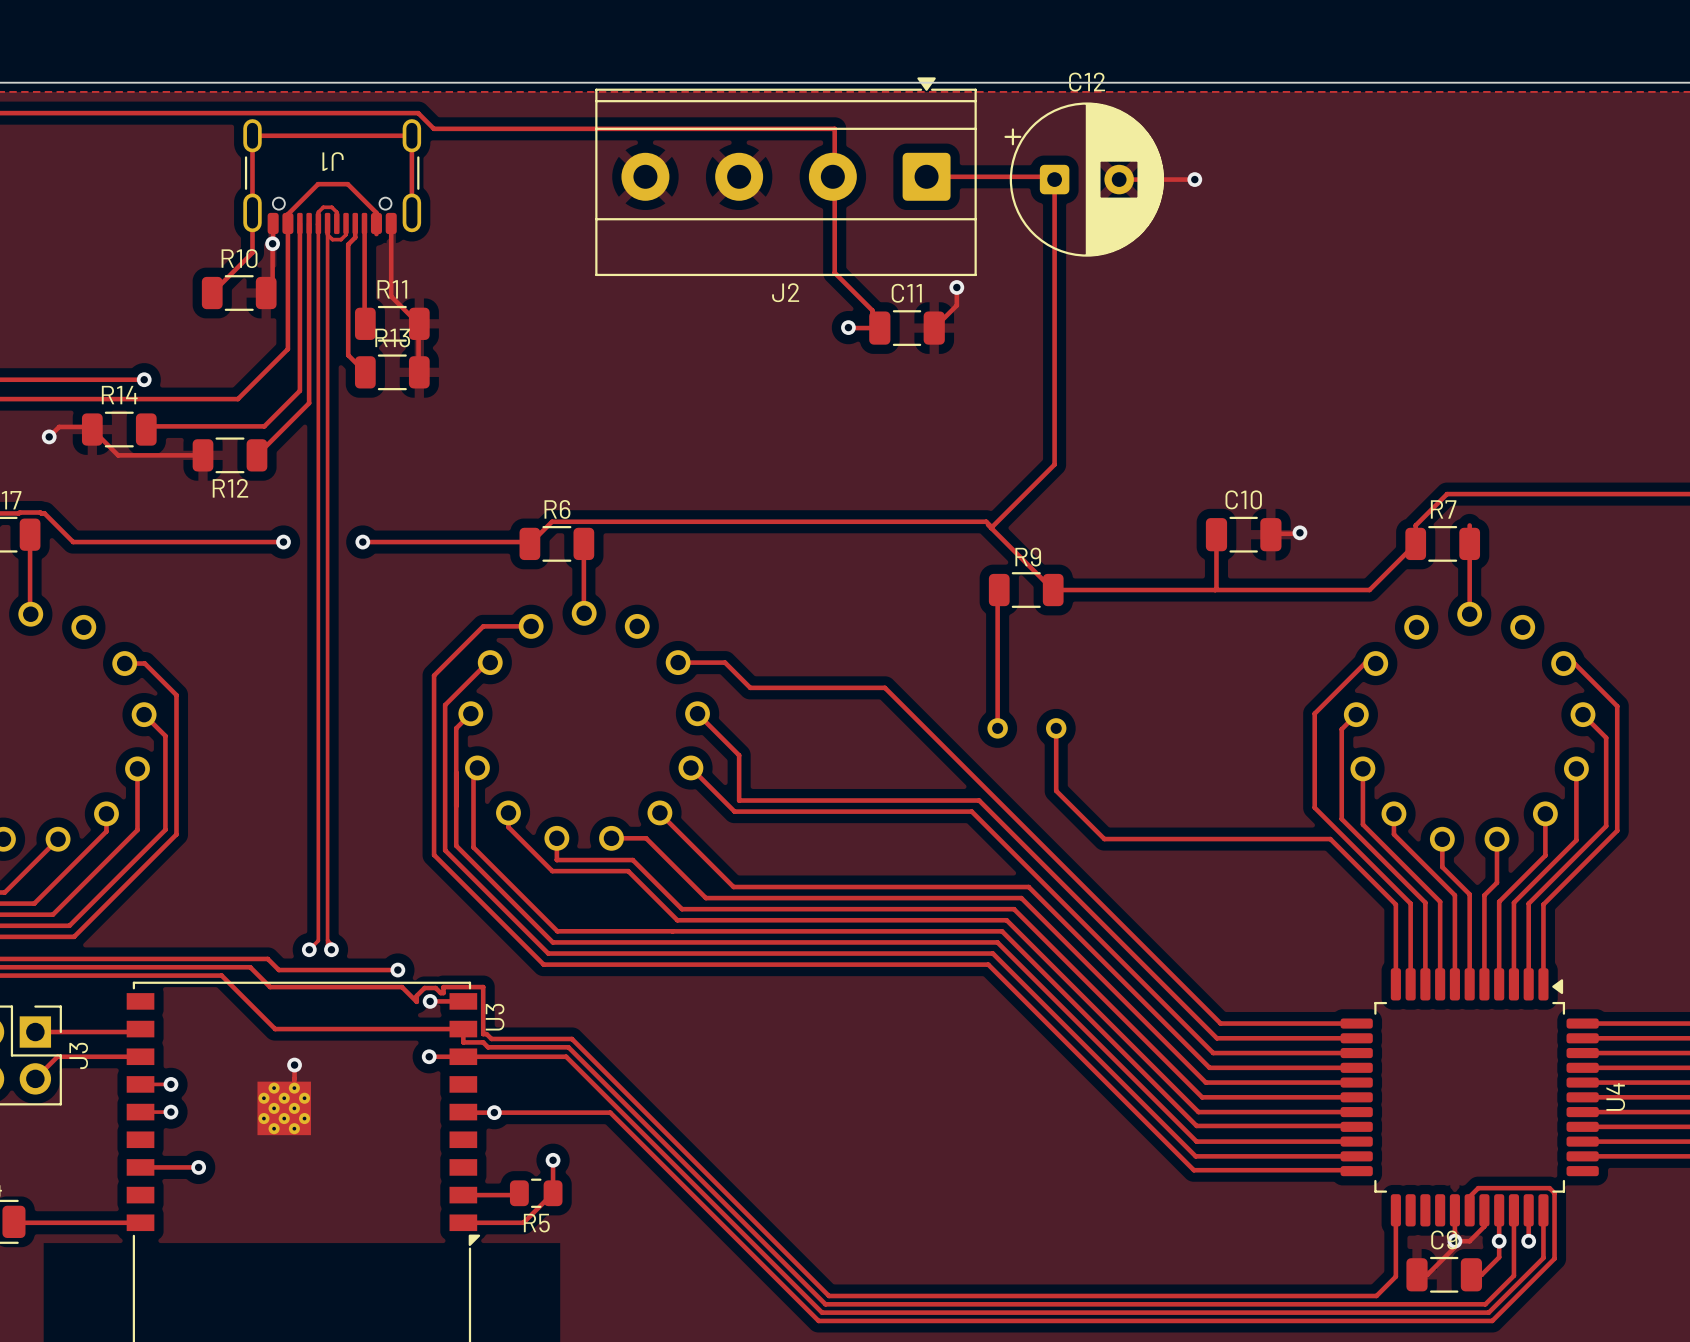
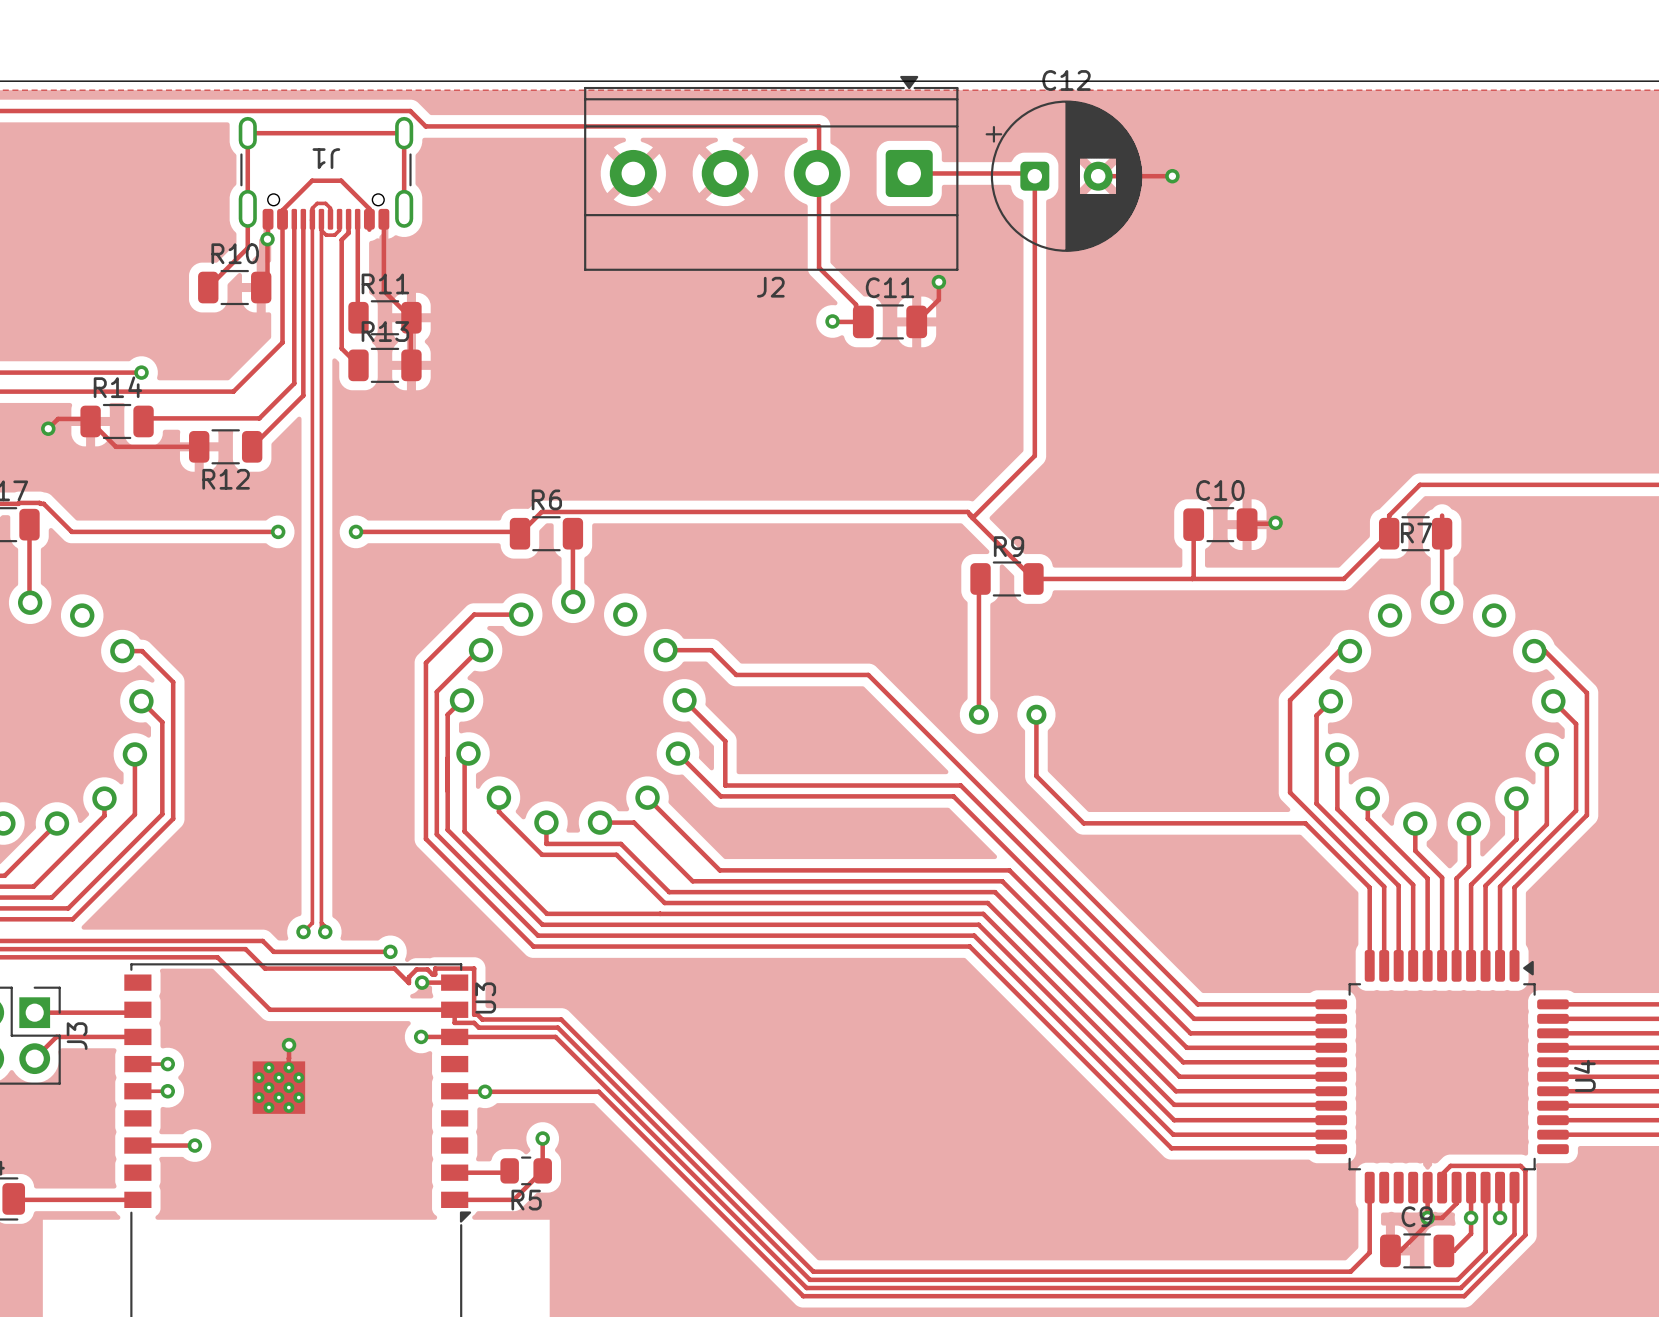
R7 name position: R7 (1443, 509) -> R7 (1416, 533)

